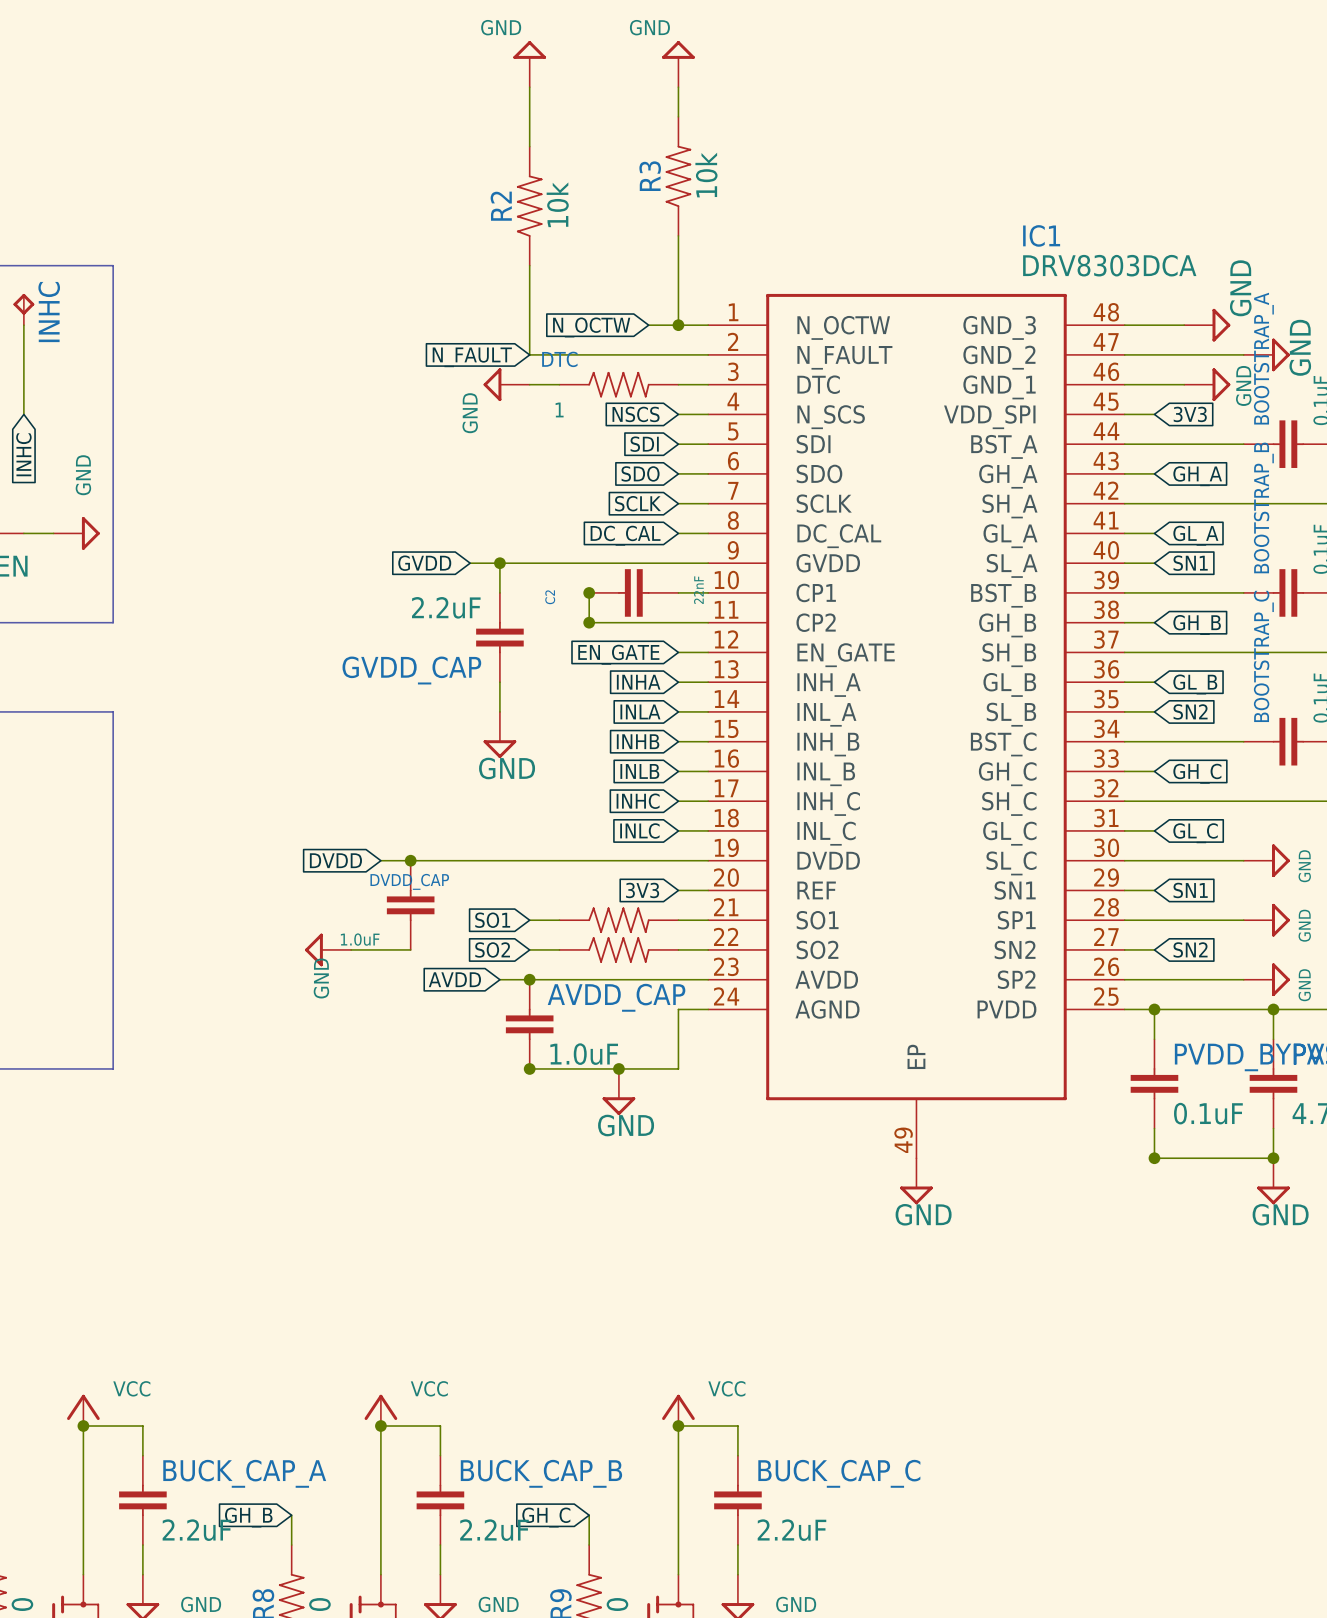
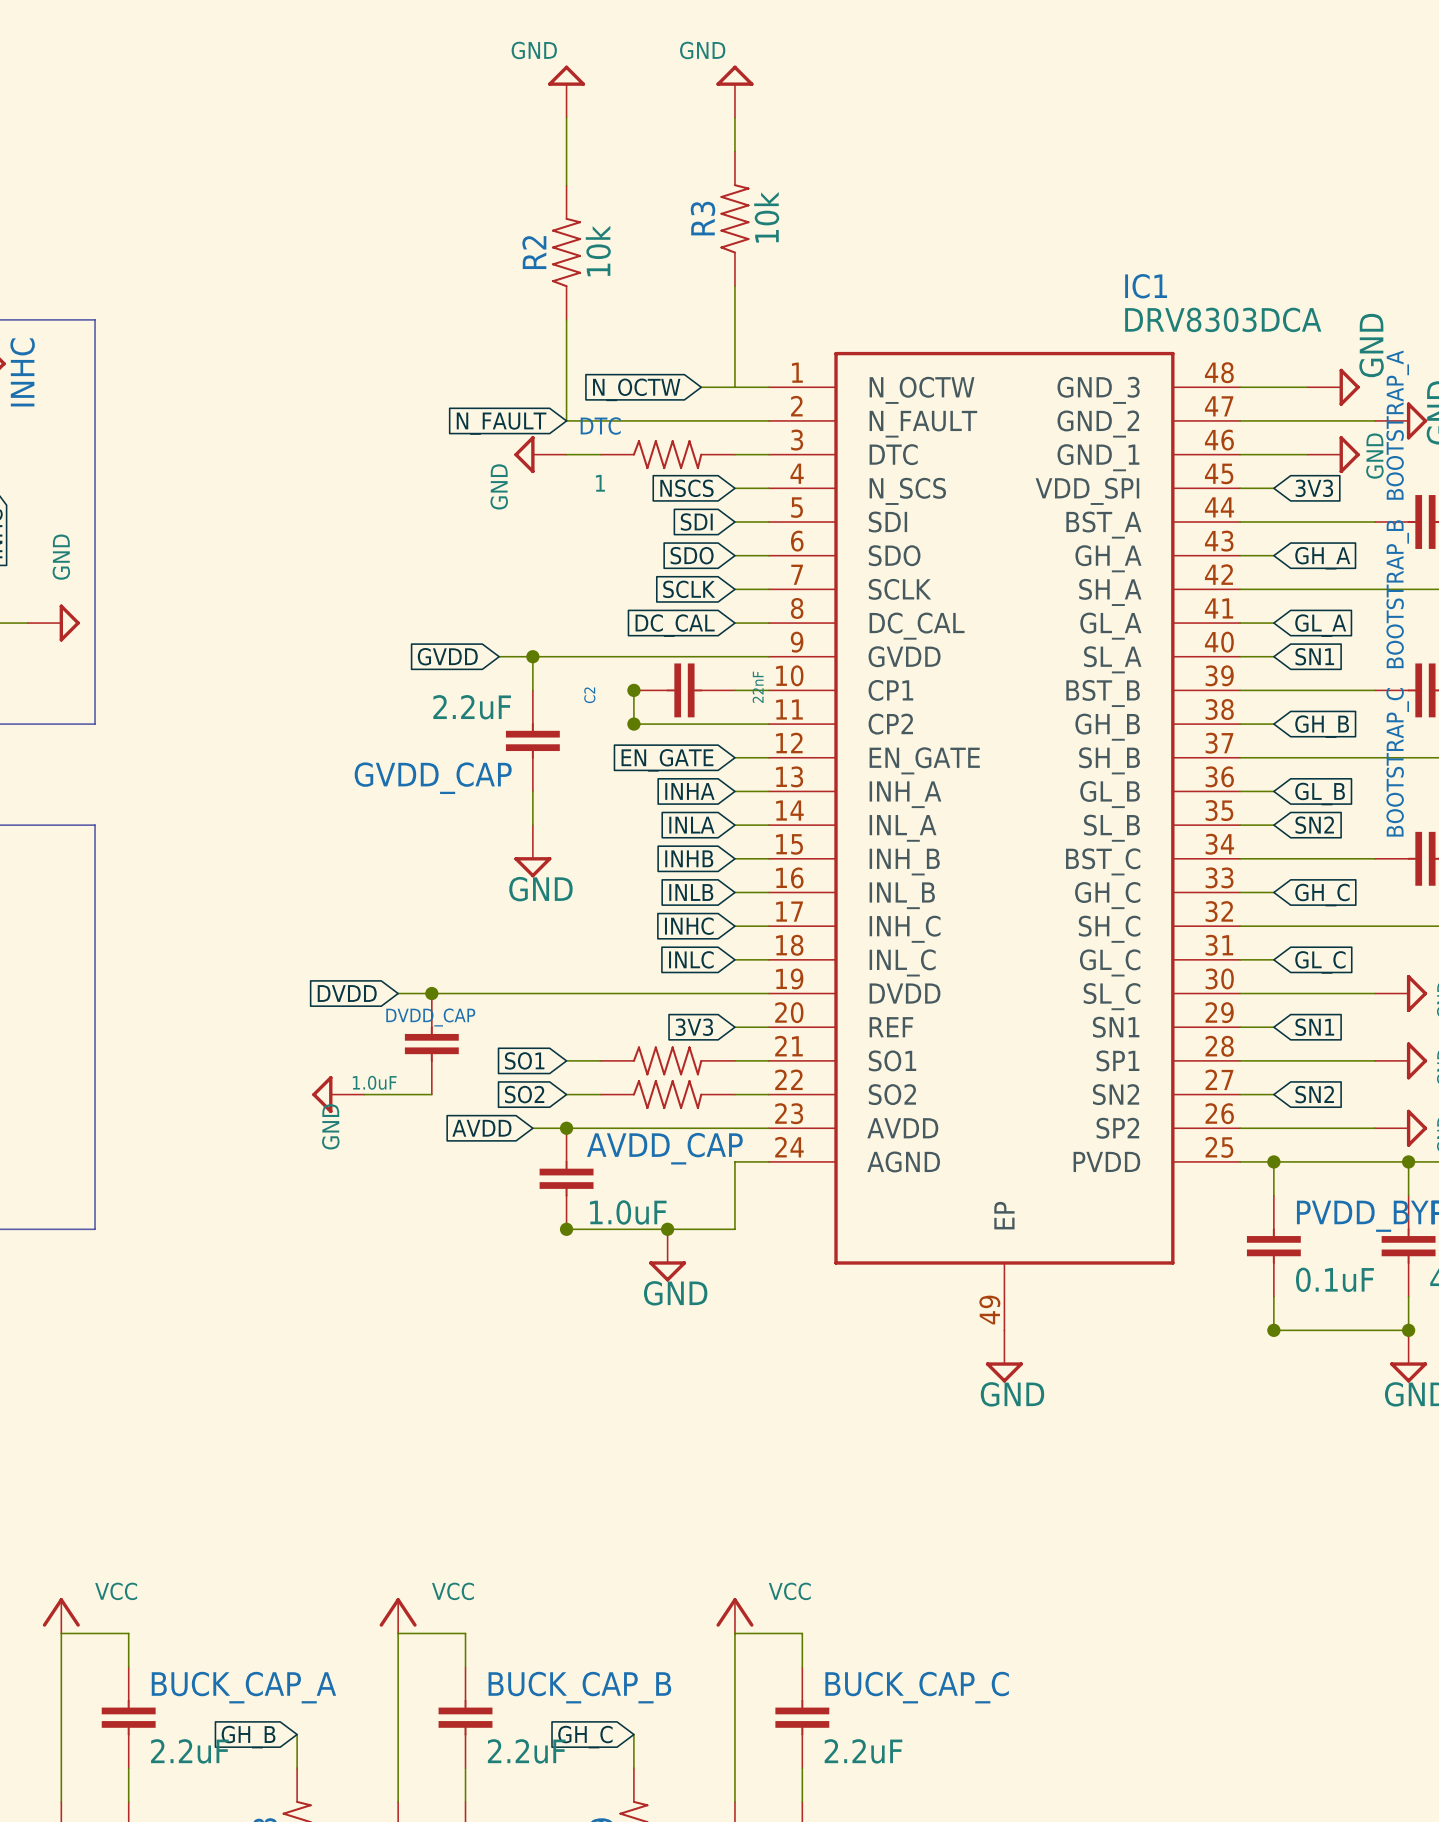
junction: (678, 325) -> none
junction: (83, 1426) -> none
junction: (380, 1426) -> none
junction: (678, 1426) -> none

